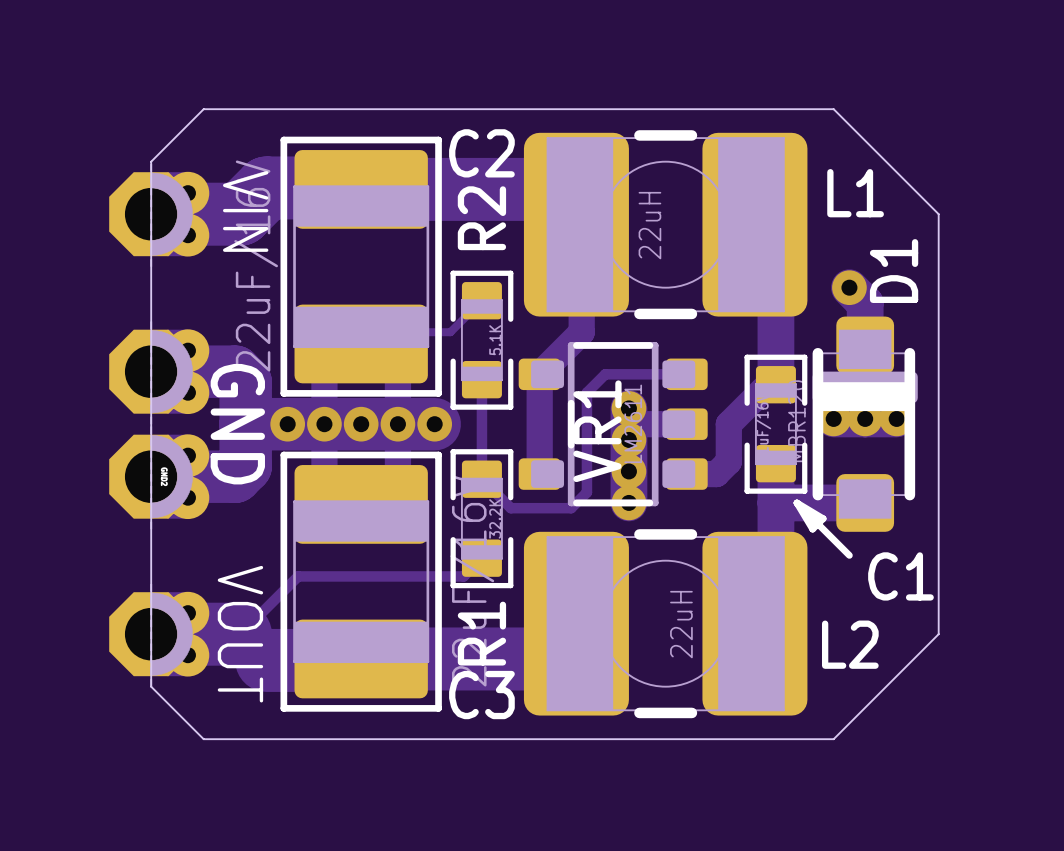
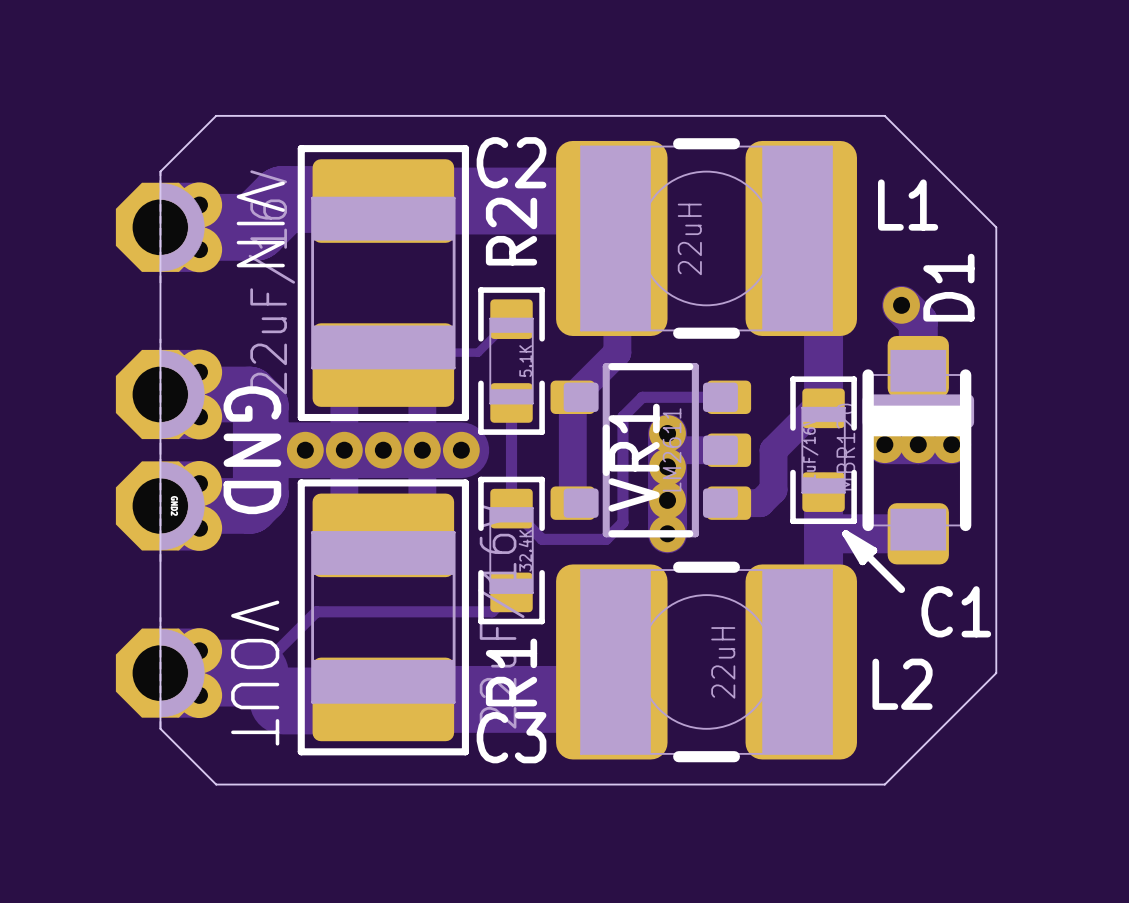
R1 value: 32.2K (495, 518) -> 32.4K (525, 550)

